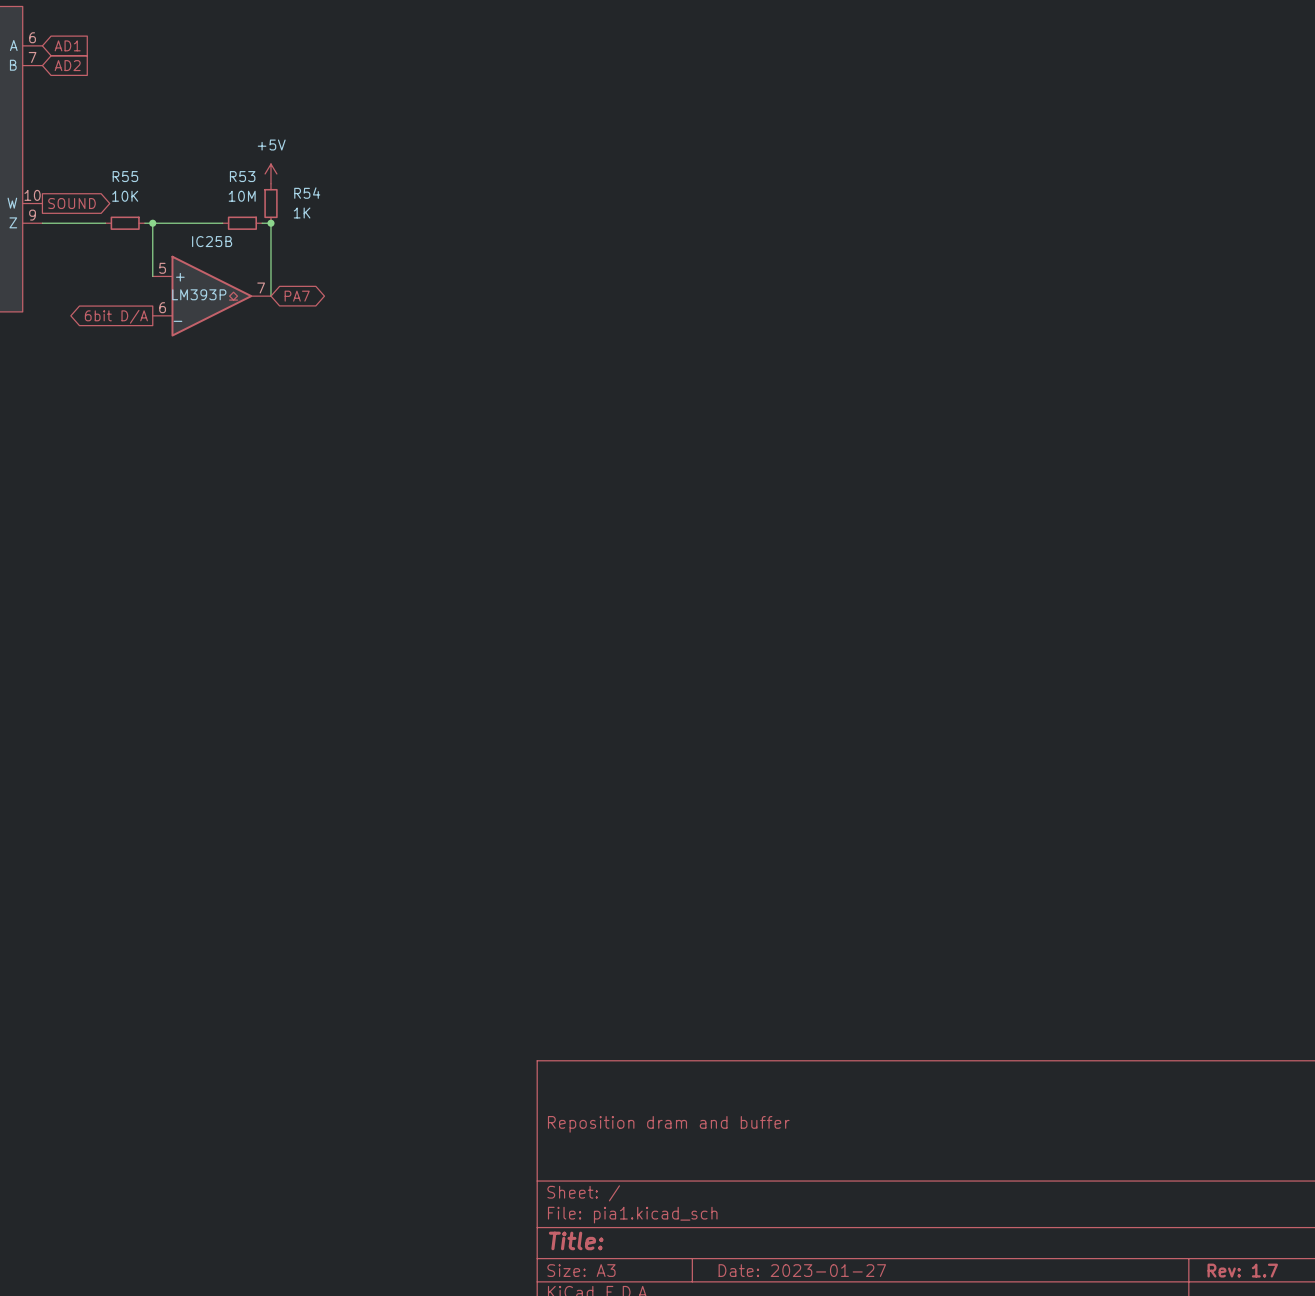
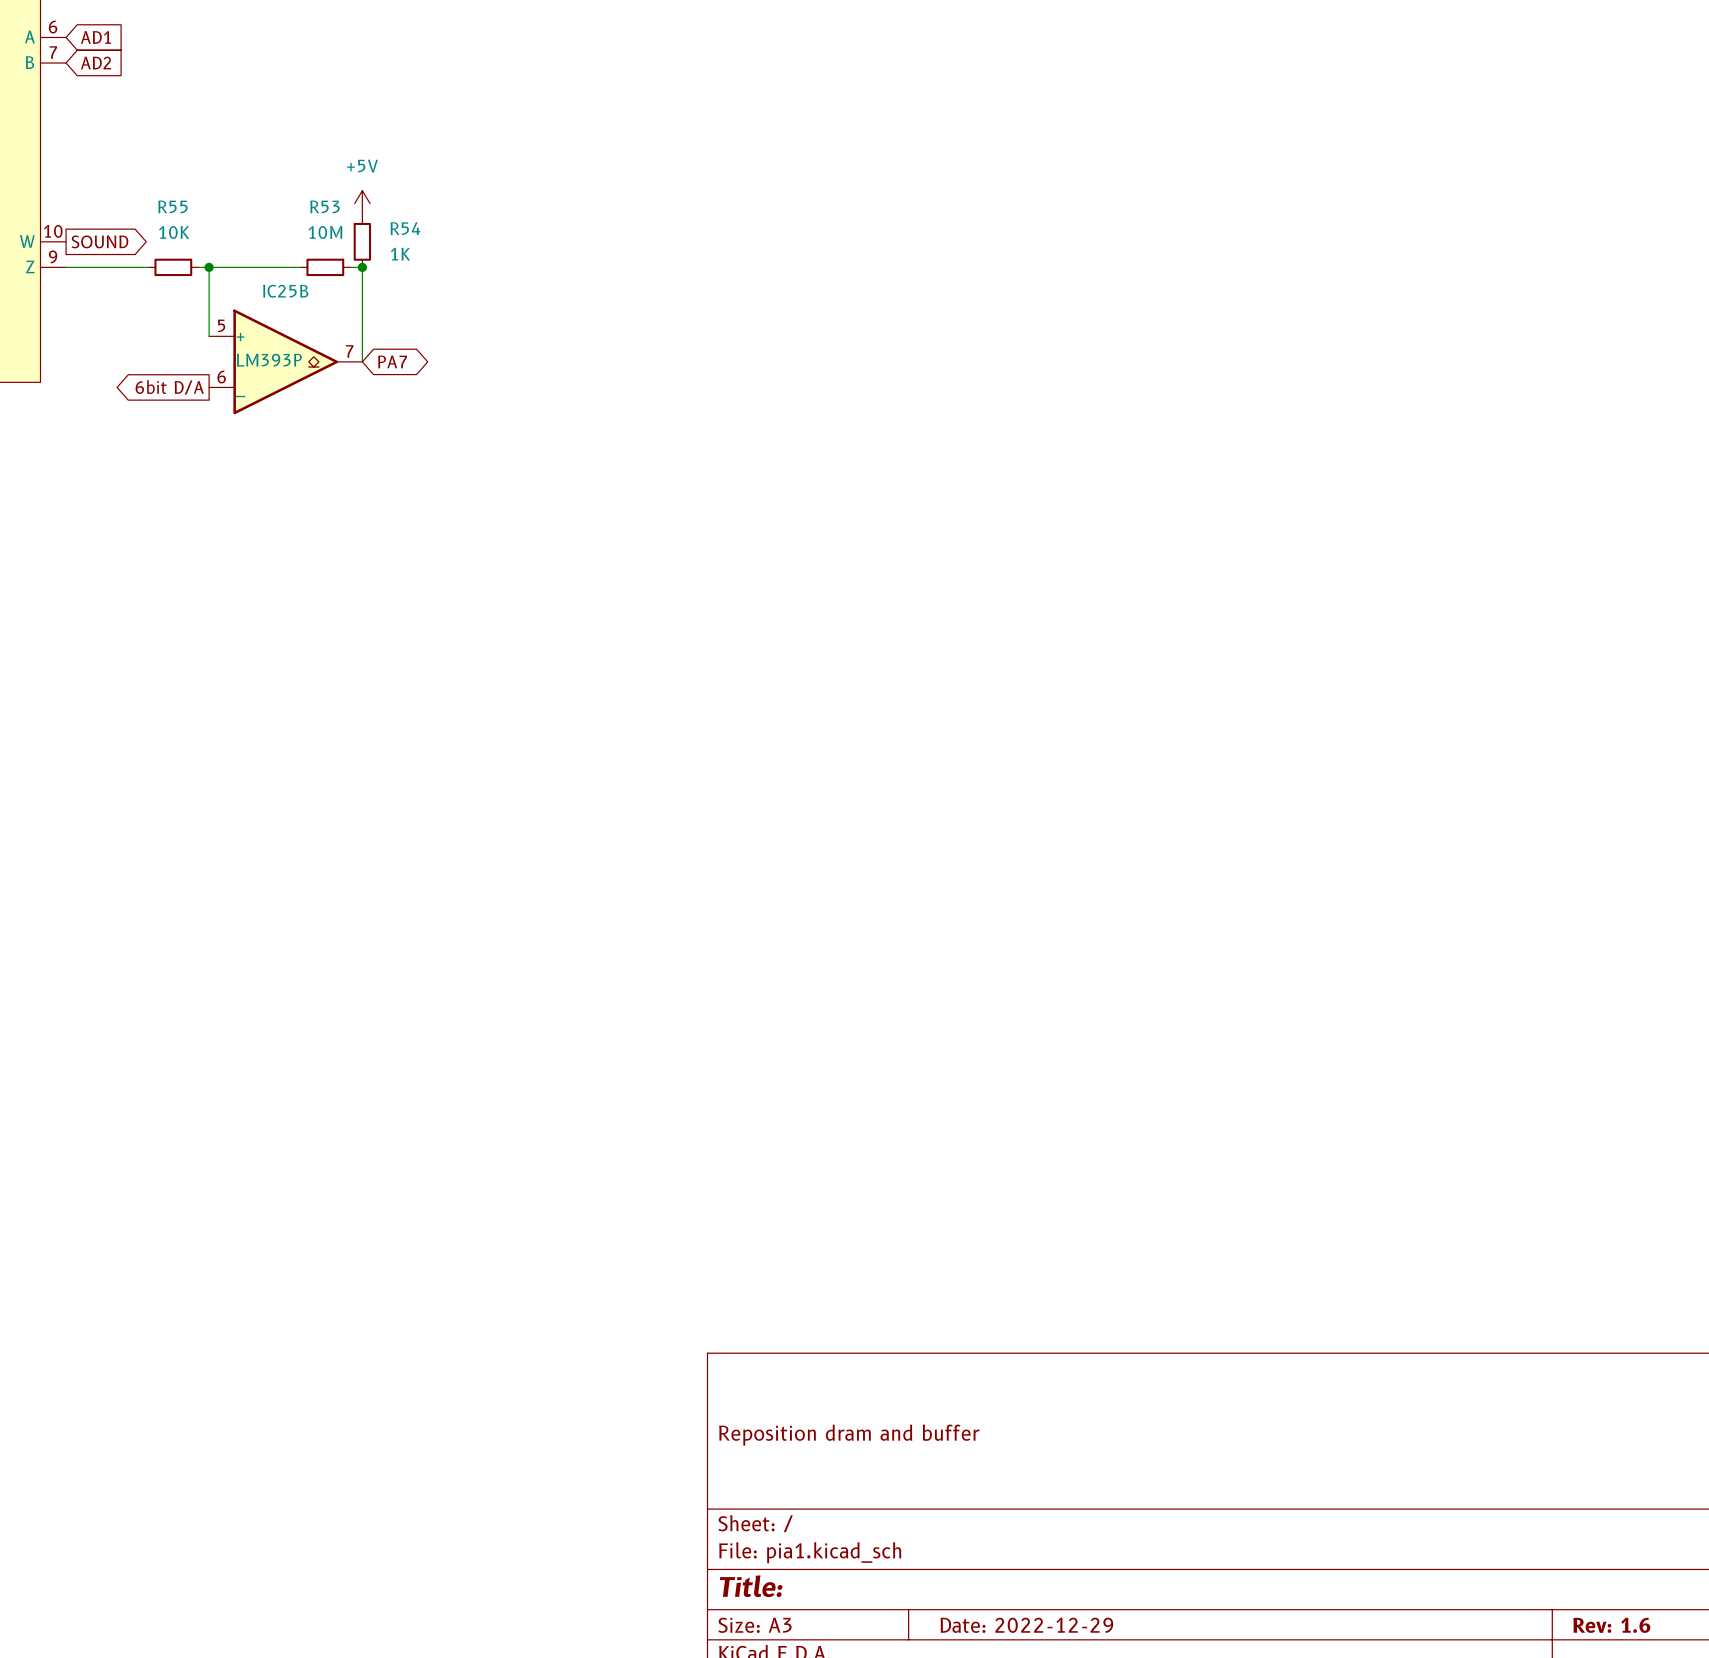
title block: Date: 2023-01-27 (802, 1270) -> Date: 2022-12-29 (1026, 1625)
title block: Rev: 1.7 (1242, 1270) -> Rev: 1.6 (1611, 1625)

